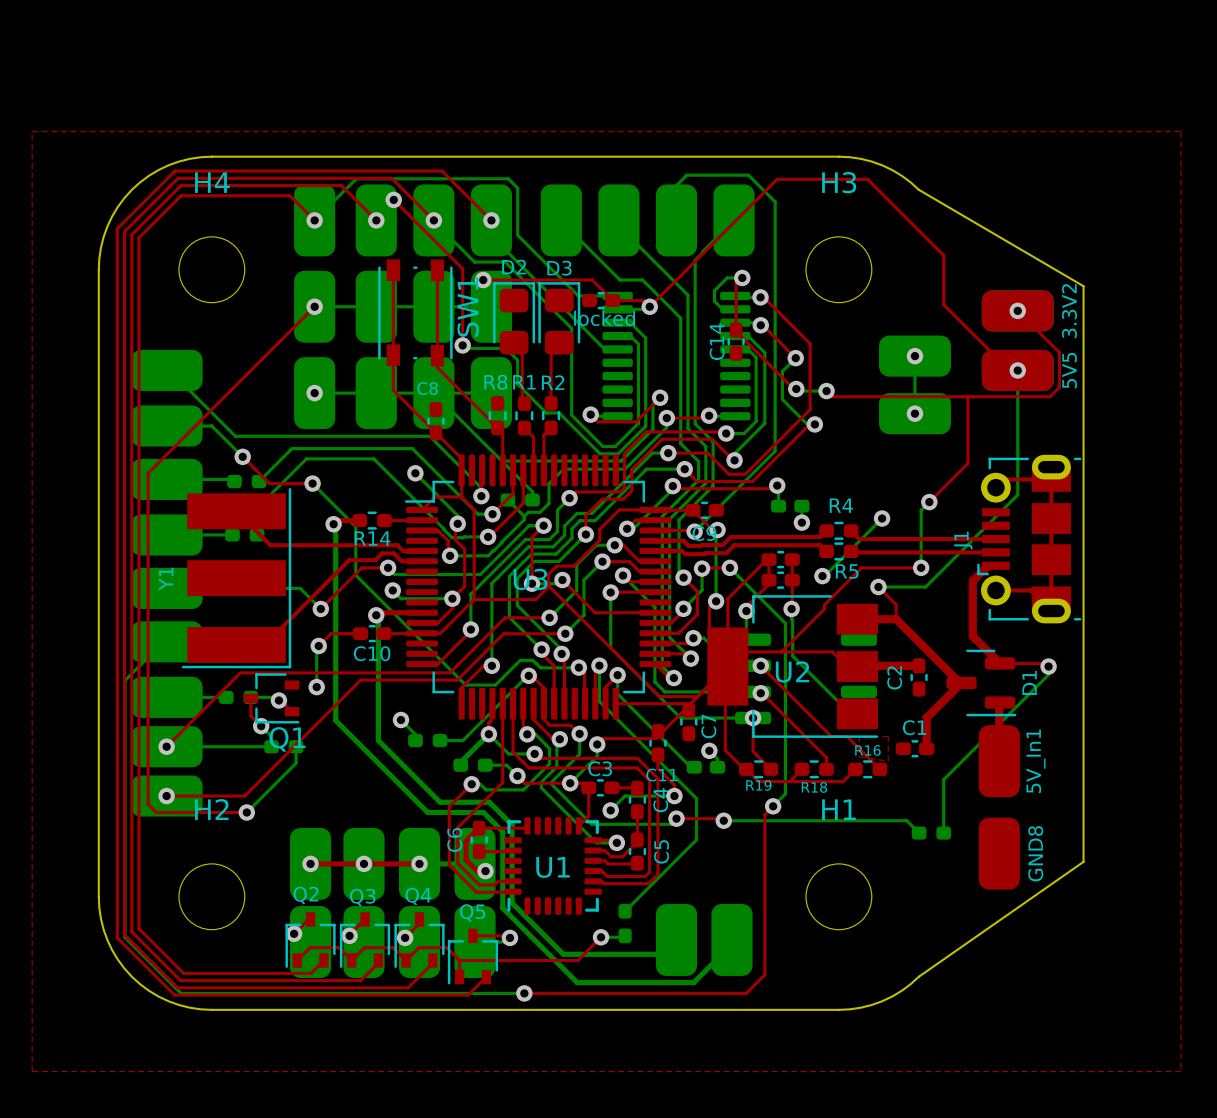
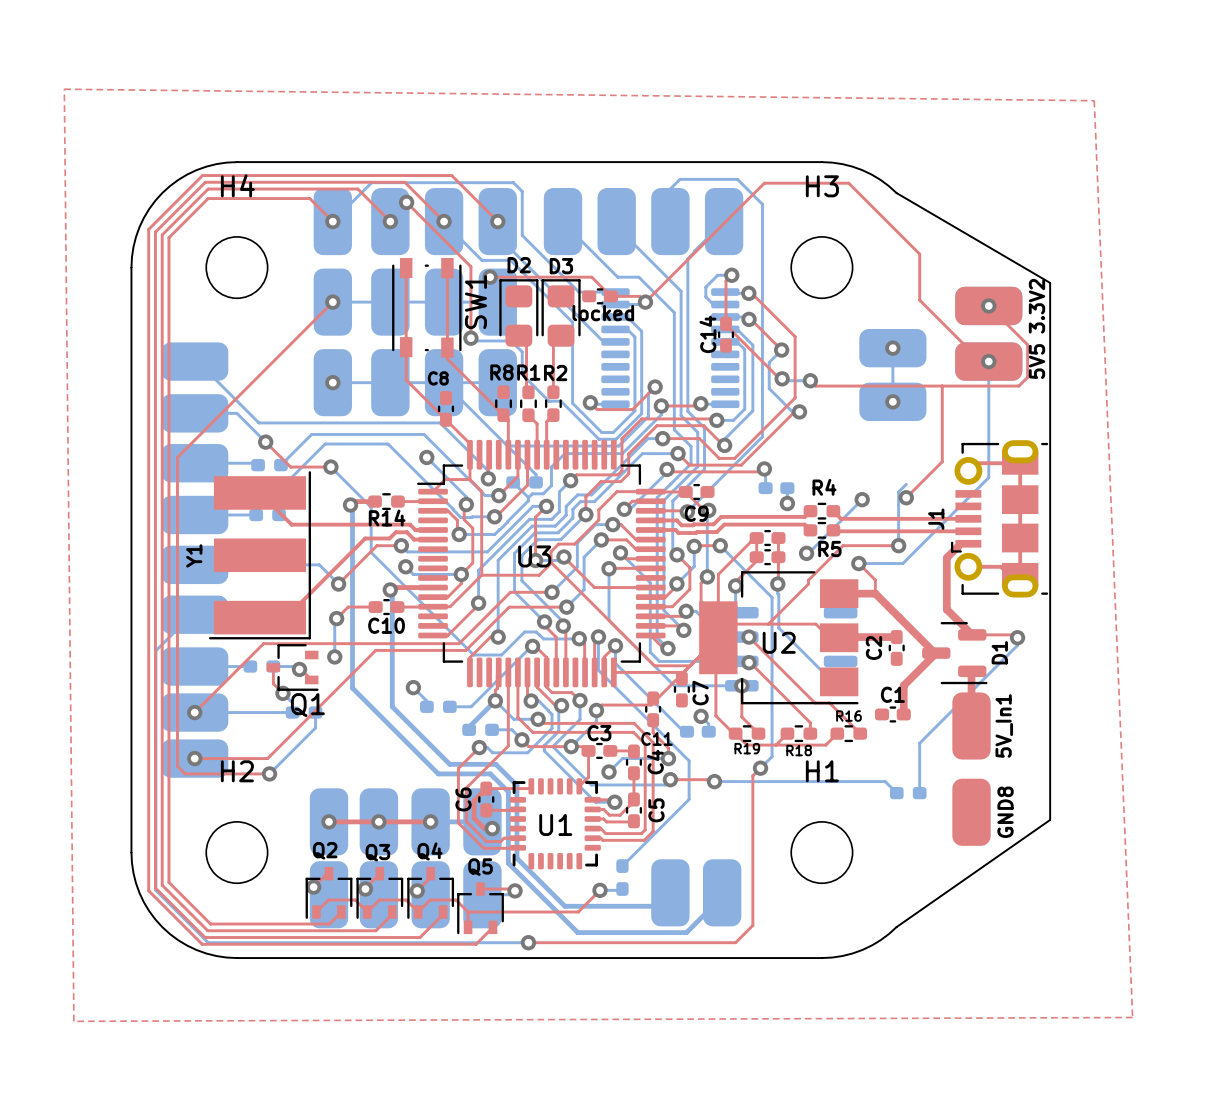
top zone outline: (32, 131) (32, 1071) (1181, 1071) (1181, 131) (32, 131) -> (64, 89) (73, 1021) (1132, 1017) (1094, 100) (64, 89)
top track: (967, 463) (929, 502) -> (942, 448) (942, 461) (906, 497)
via position: (929, 502) -> (906, 497)
top zone outline: (859, 736) (888, 736) (888, 761) (859, 757) (859, 736) -> none

